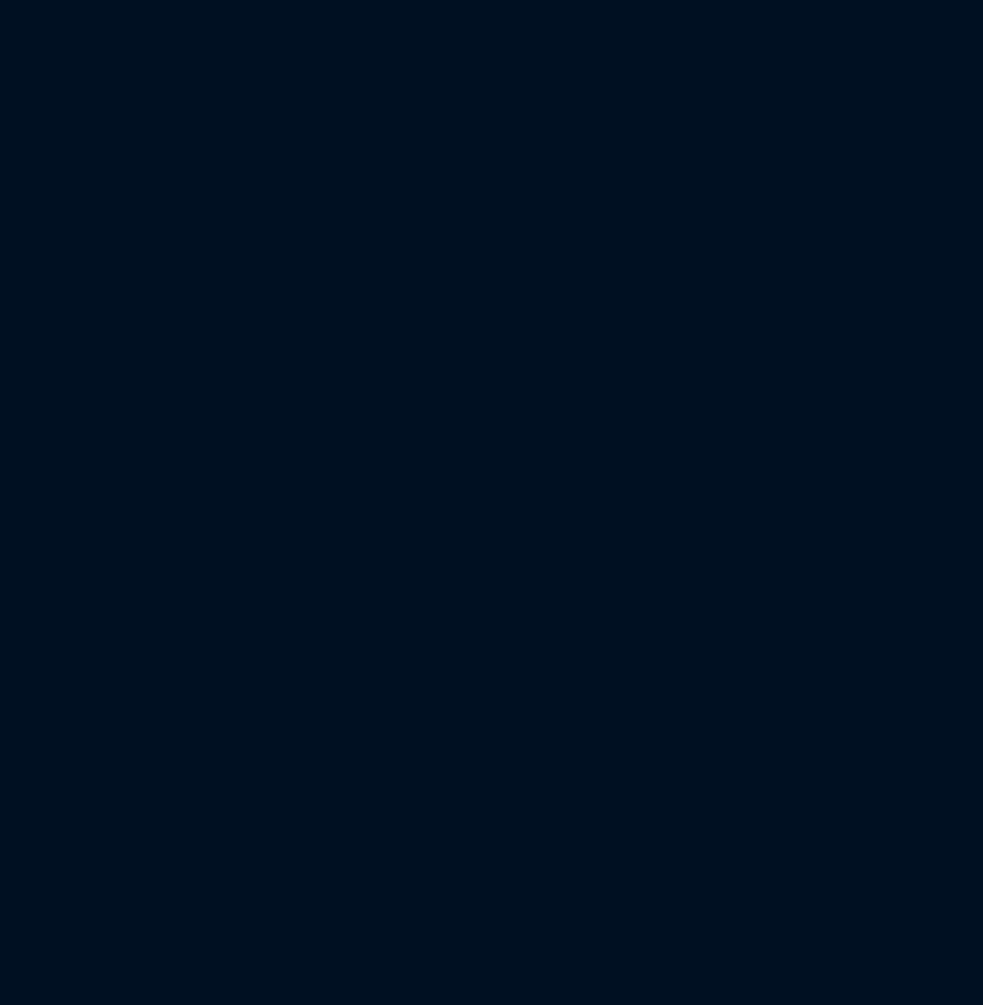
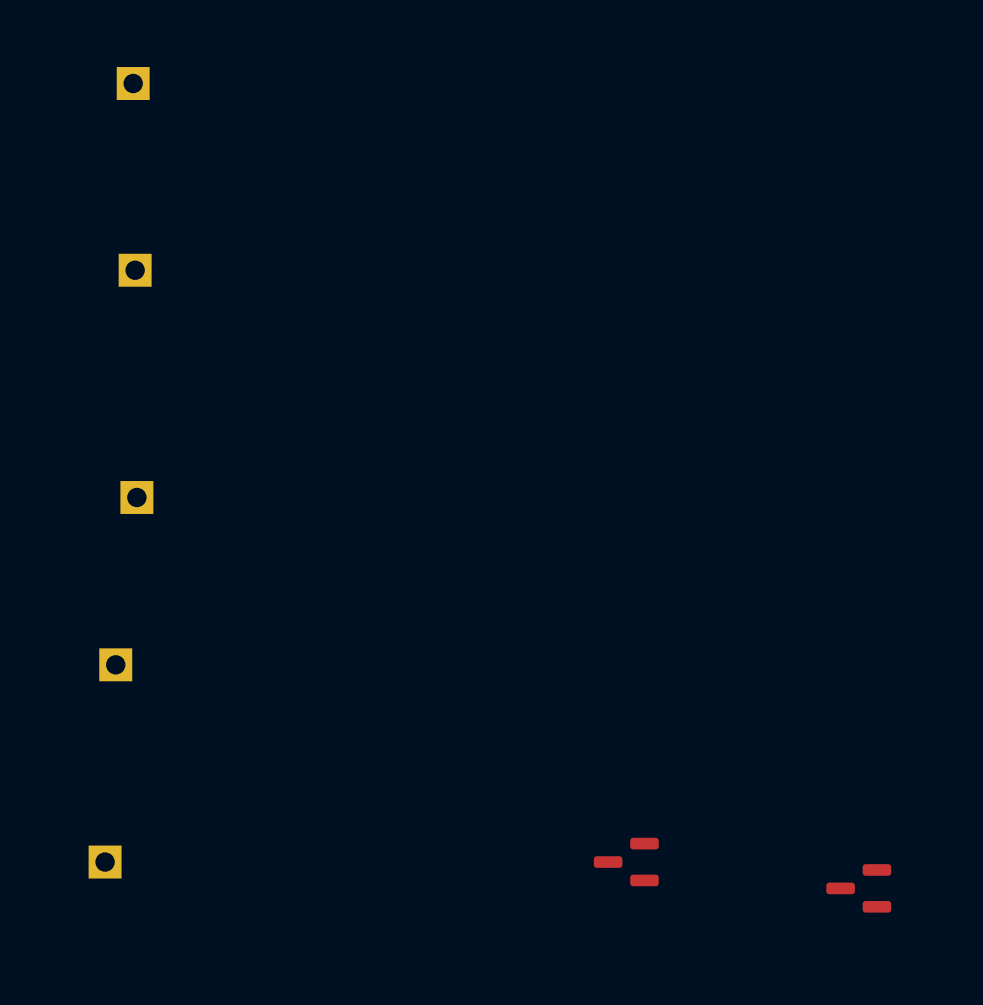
part: none -> (133, 83)
part: none -> (135, 270)
part: none -> (136, 497)
part: none -> (115, 664)
part: none -> (105, 862)
part: none -> (626, 862)
part: none -> (858, 888)

